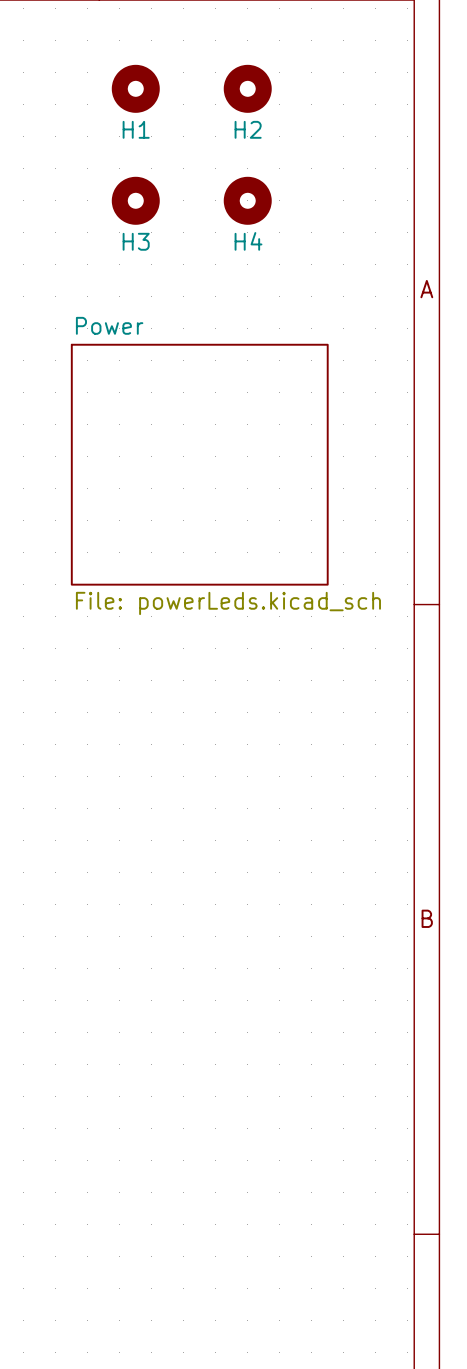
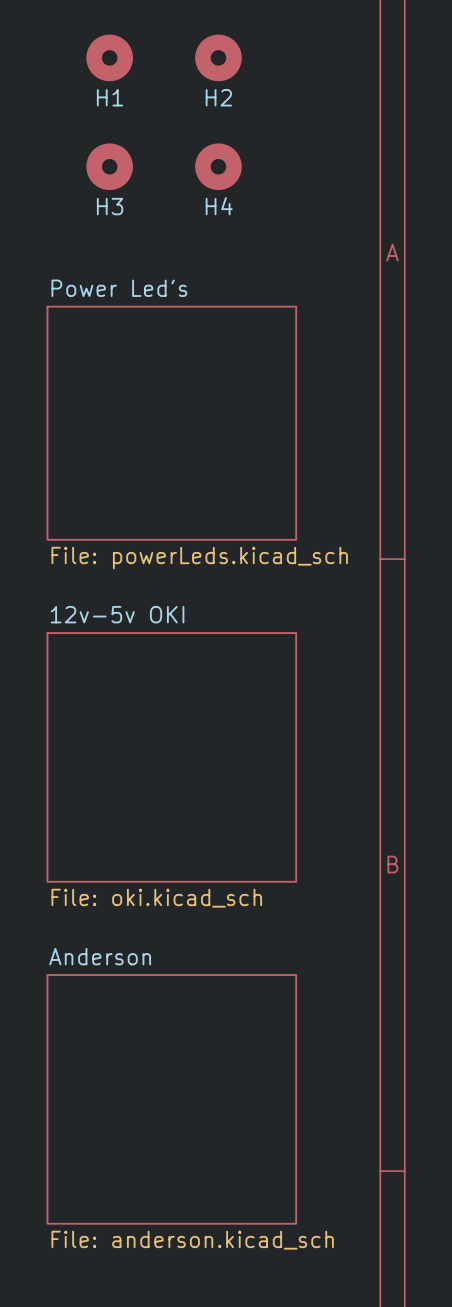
sheet Power name: Power (109, 325) -> Power Led's (119, 288)
sheet 12v-5v OKI: none -> File: oki.kicad_sch (171, 757)
sheet Anderson: none -> File: anderson.kicad_sch (171, 1099)

